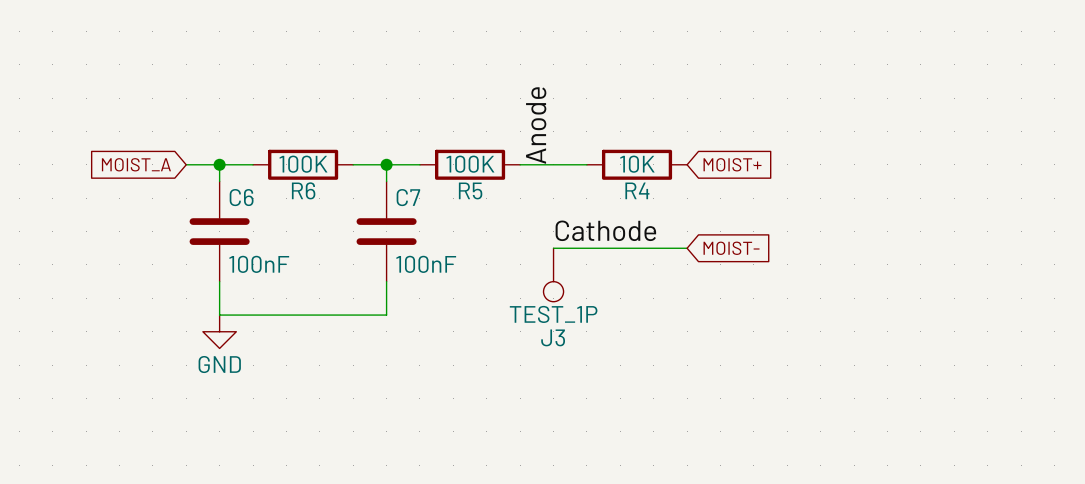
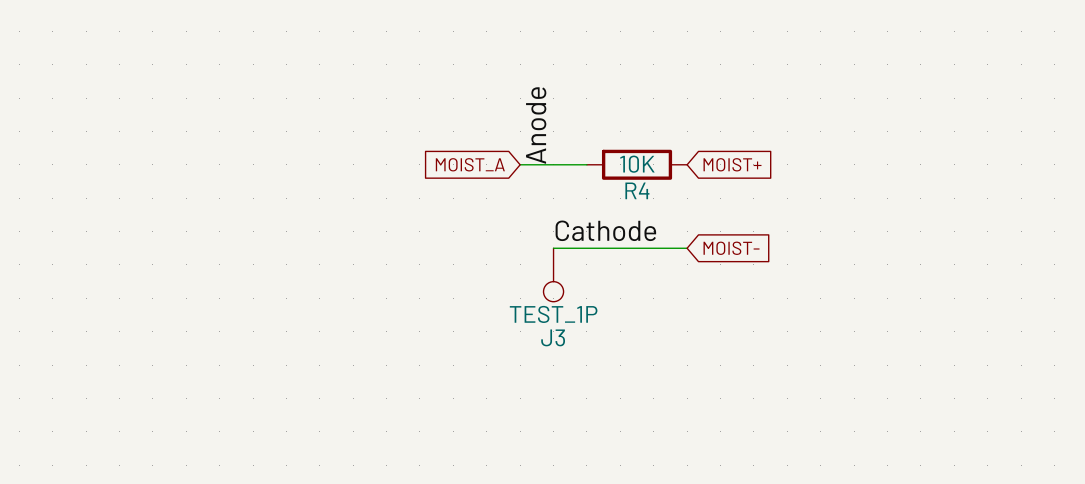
global label: MOIST_A (136, 164) -> none
wire: (186, 164) (253, 164) -> none
wire: (219, 164) (219, 181) -> none
junction: (219, 164) -> none
R6: 100K (303, 164) -> none
wire: (353, 164) (419, 164) -> none
wire: (386, 164) (386, 181) -> none
junction: (386, 164) -> none
global label: none -> MOIST_A (470, 164)
R5: 100K (470, 164) -> none
C6: 100nF (219, 231) -> none
C7: 100nF (386, 231) -> none
wire: (219, 281) (219, 315) (386, 315) (386, 281) -> none
power symbol: GND (219, 331) -> none

